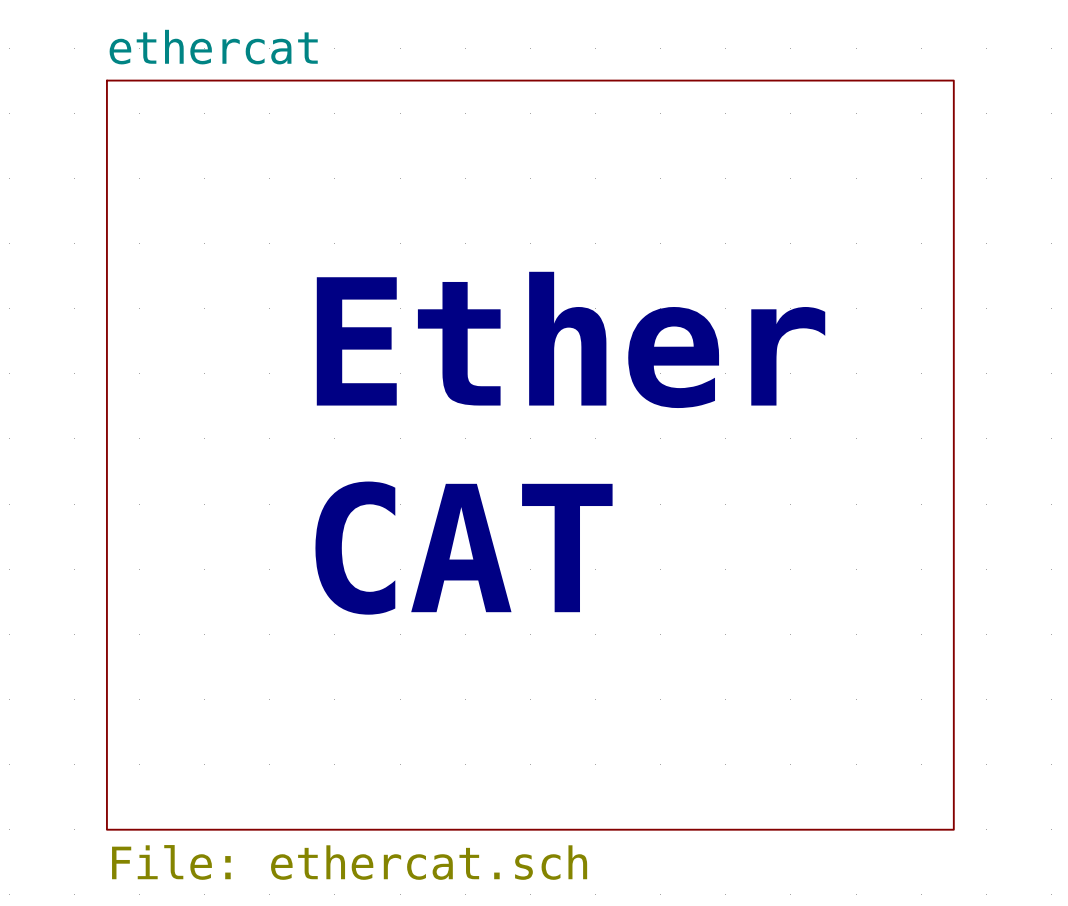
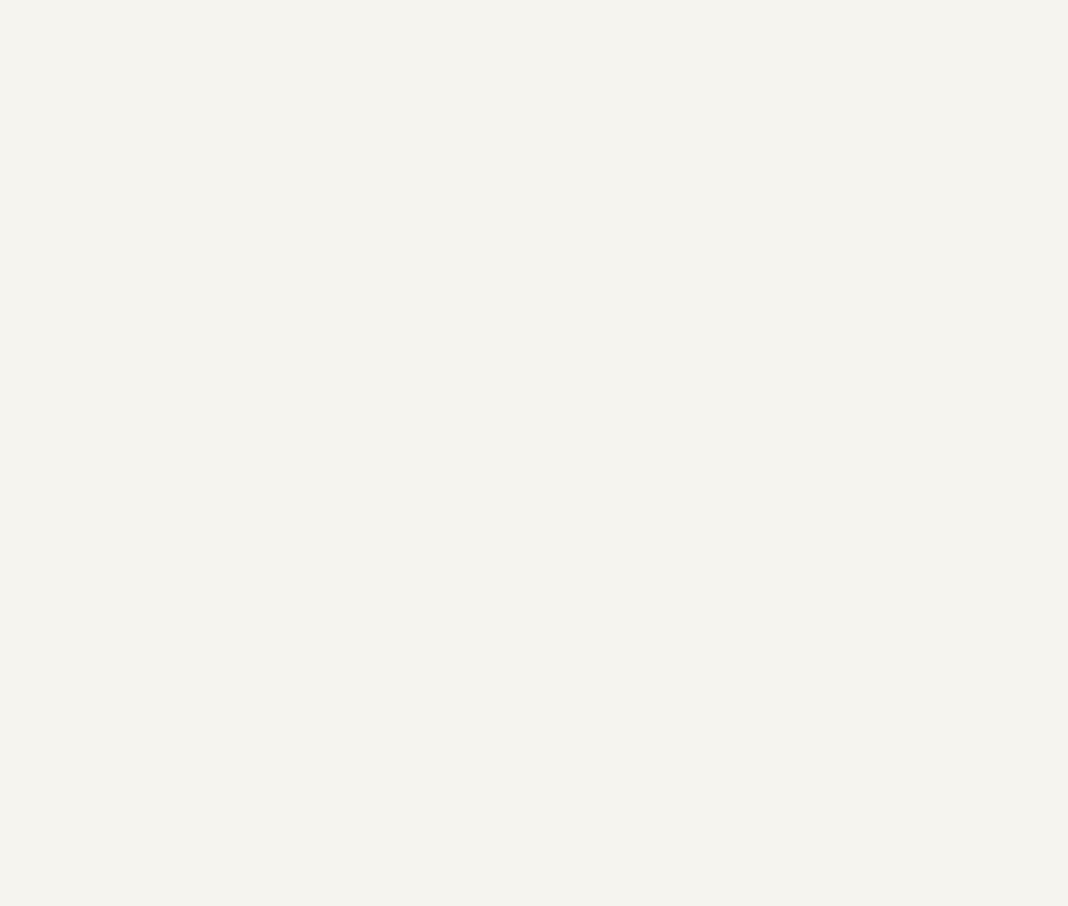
text: Ether (571, 339) -> none
sheet ethercat: File: ethercat.sch (530, 455) -> none
text: CAT (464, 548) -> none

